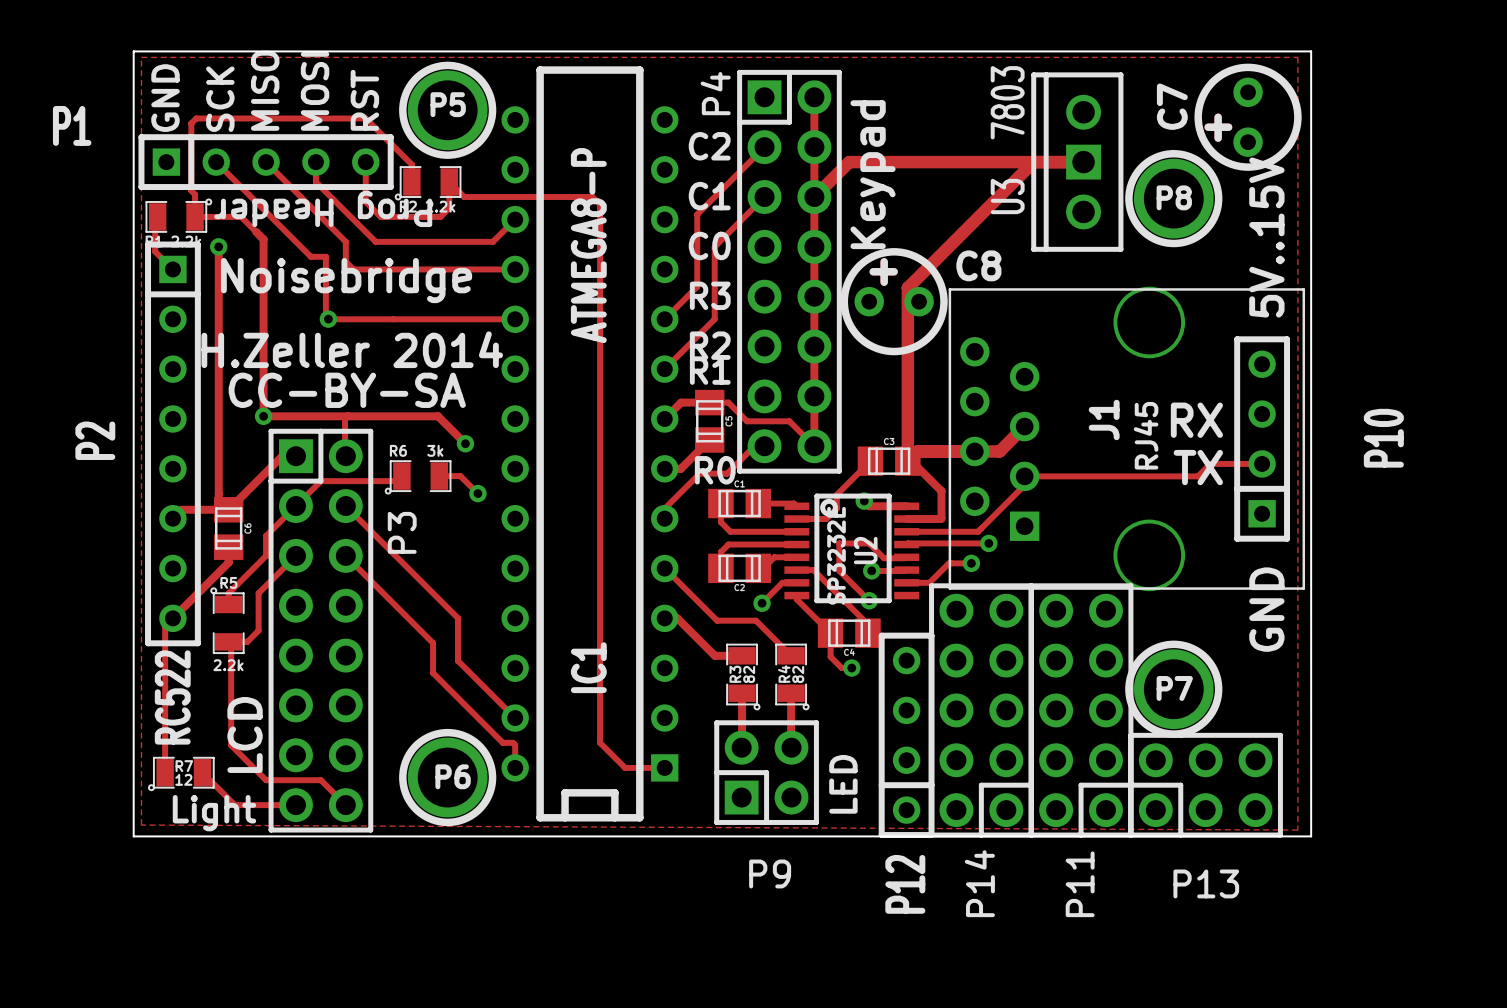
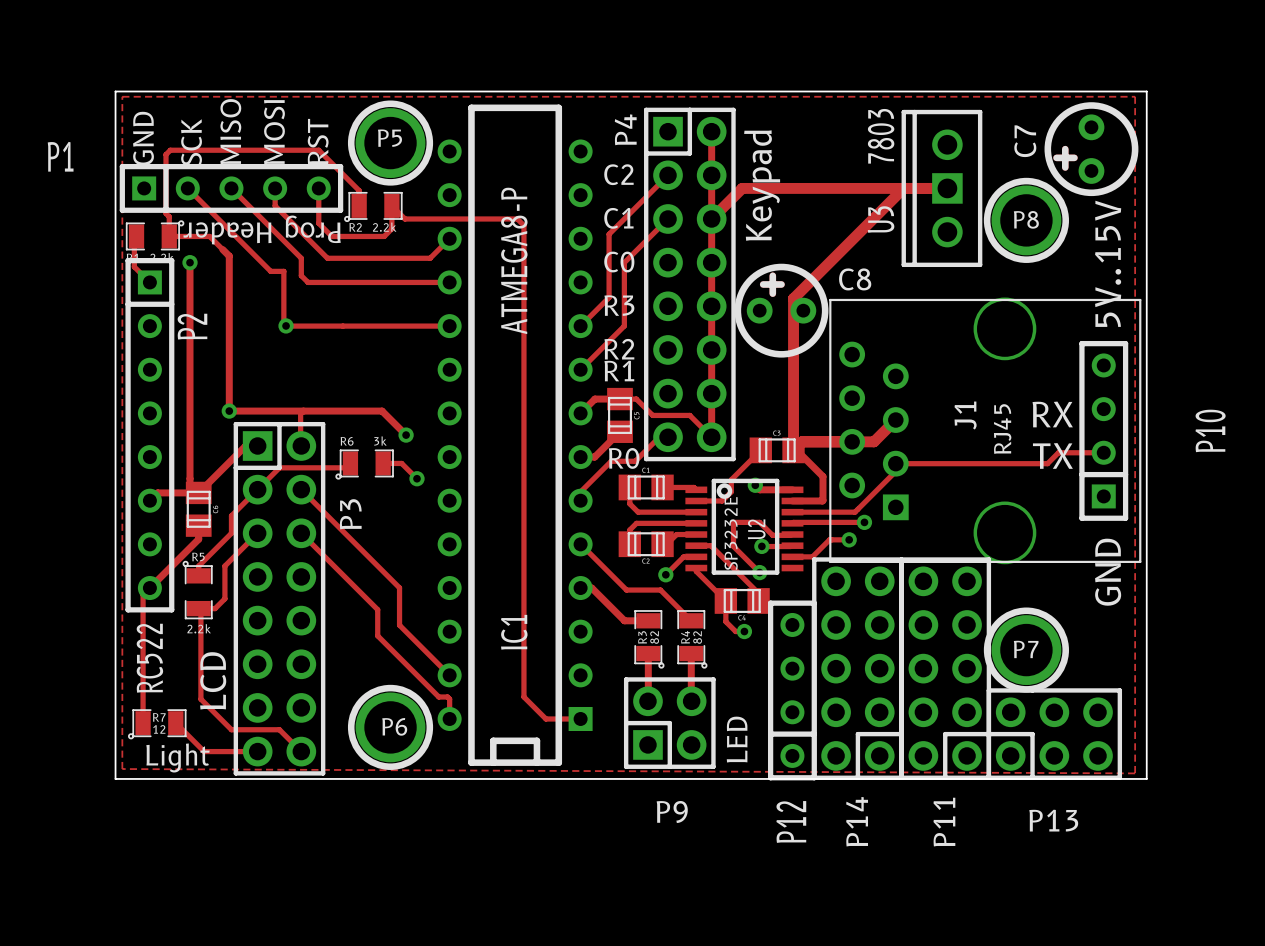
text: Noisebridge (346, 280) -> none
text: H.Zeller 2014 (352, 349) -> none
text: CC-BY-SA (347, 390) -> none
P2 name position: P2 (95, 440) -> P2 (192, 326)

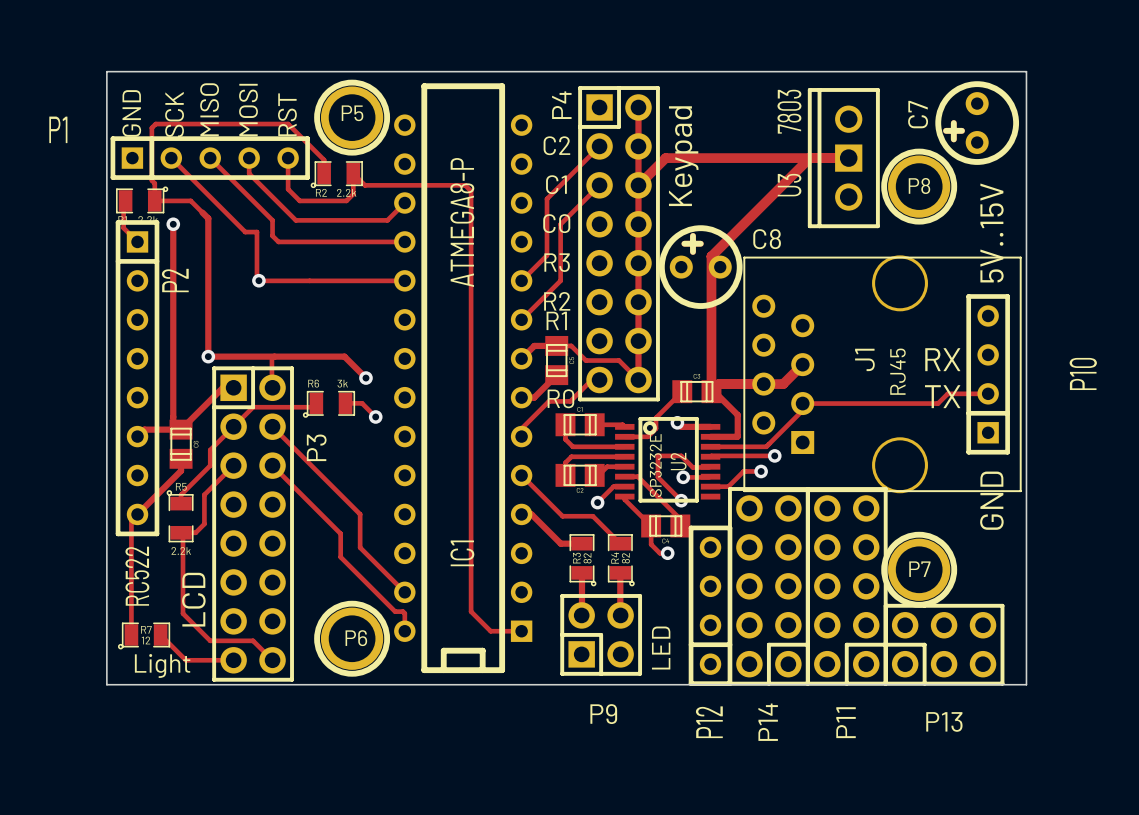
zone outline: (122, 96) (1135, 96) (1135, 773) (122, 769) (122, 96) -> none
text: Prog Header (262, 230) -> none

